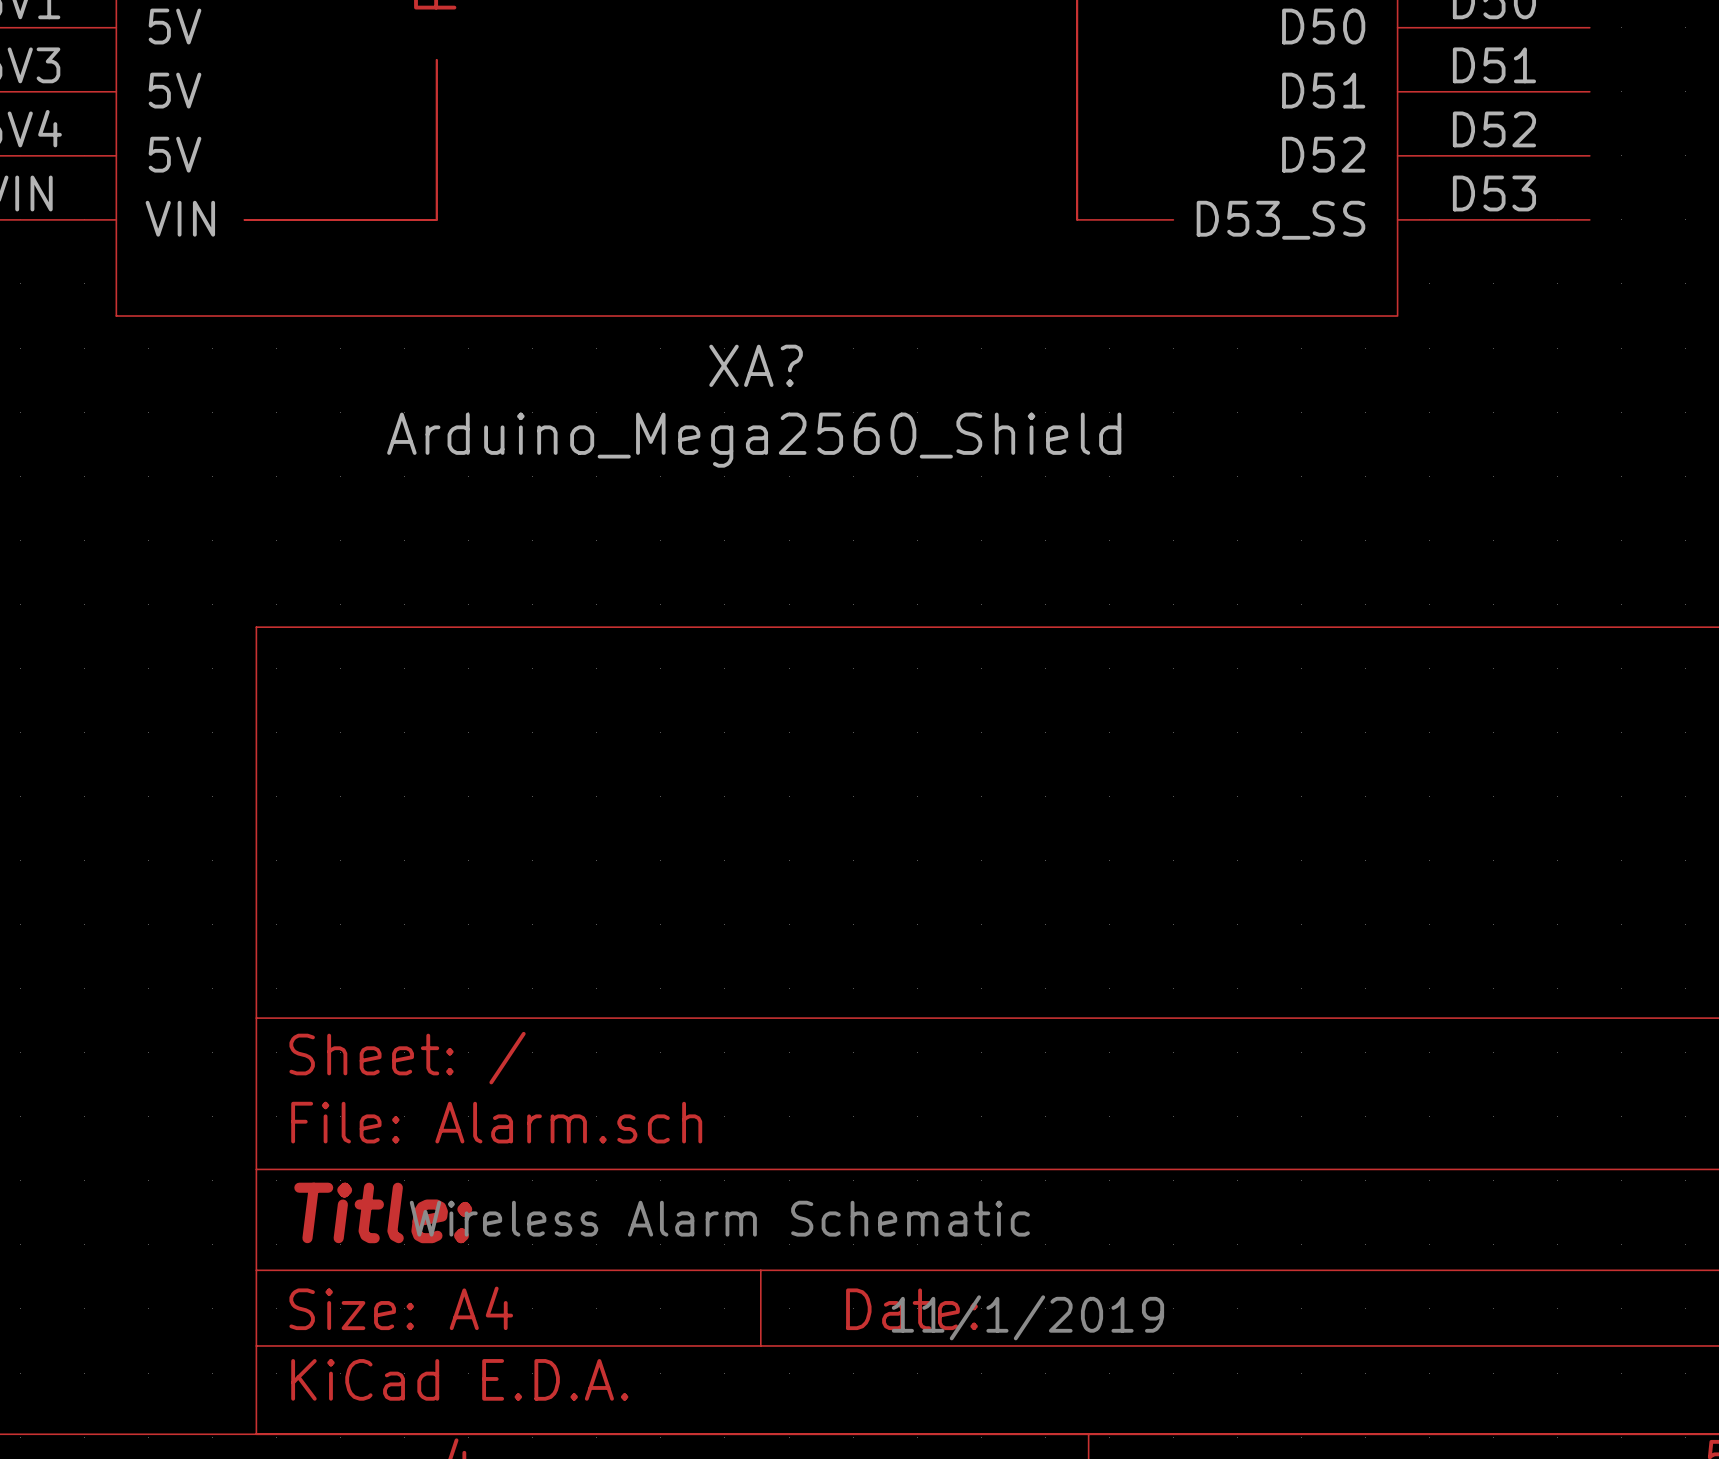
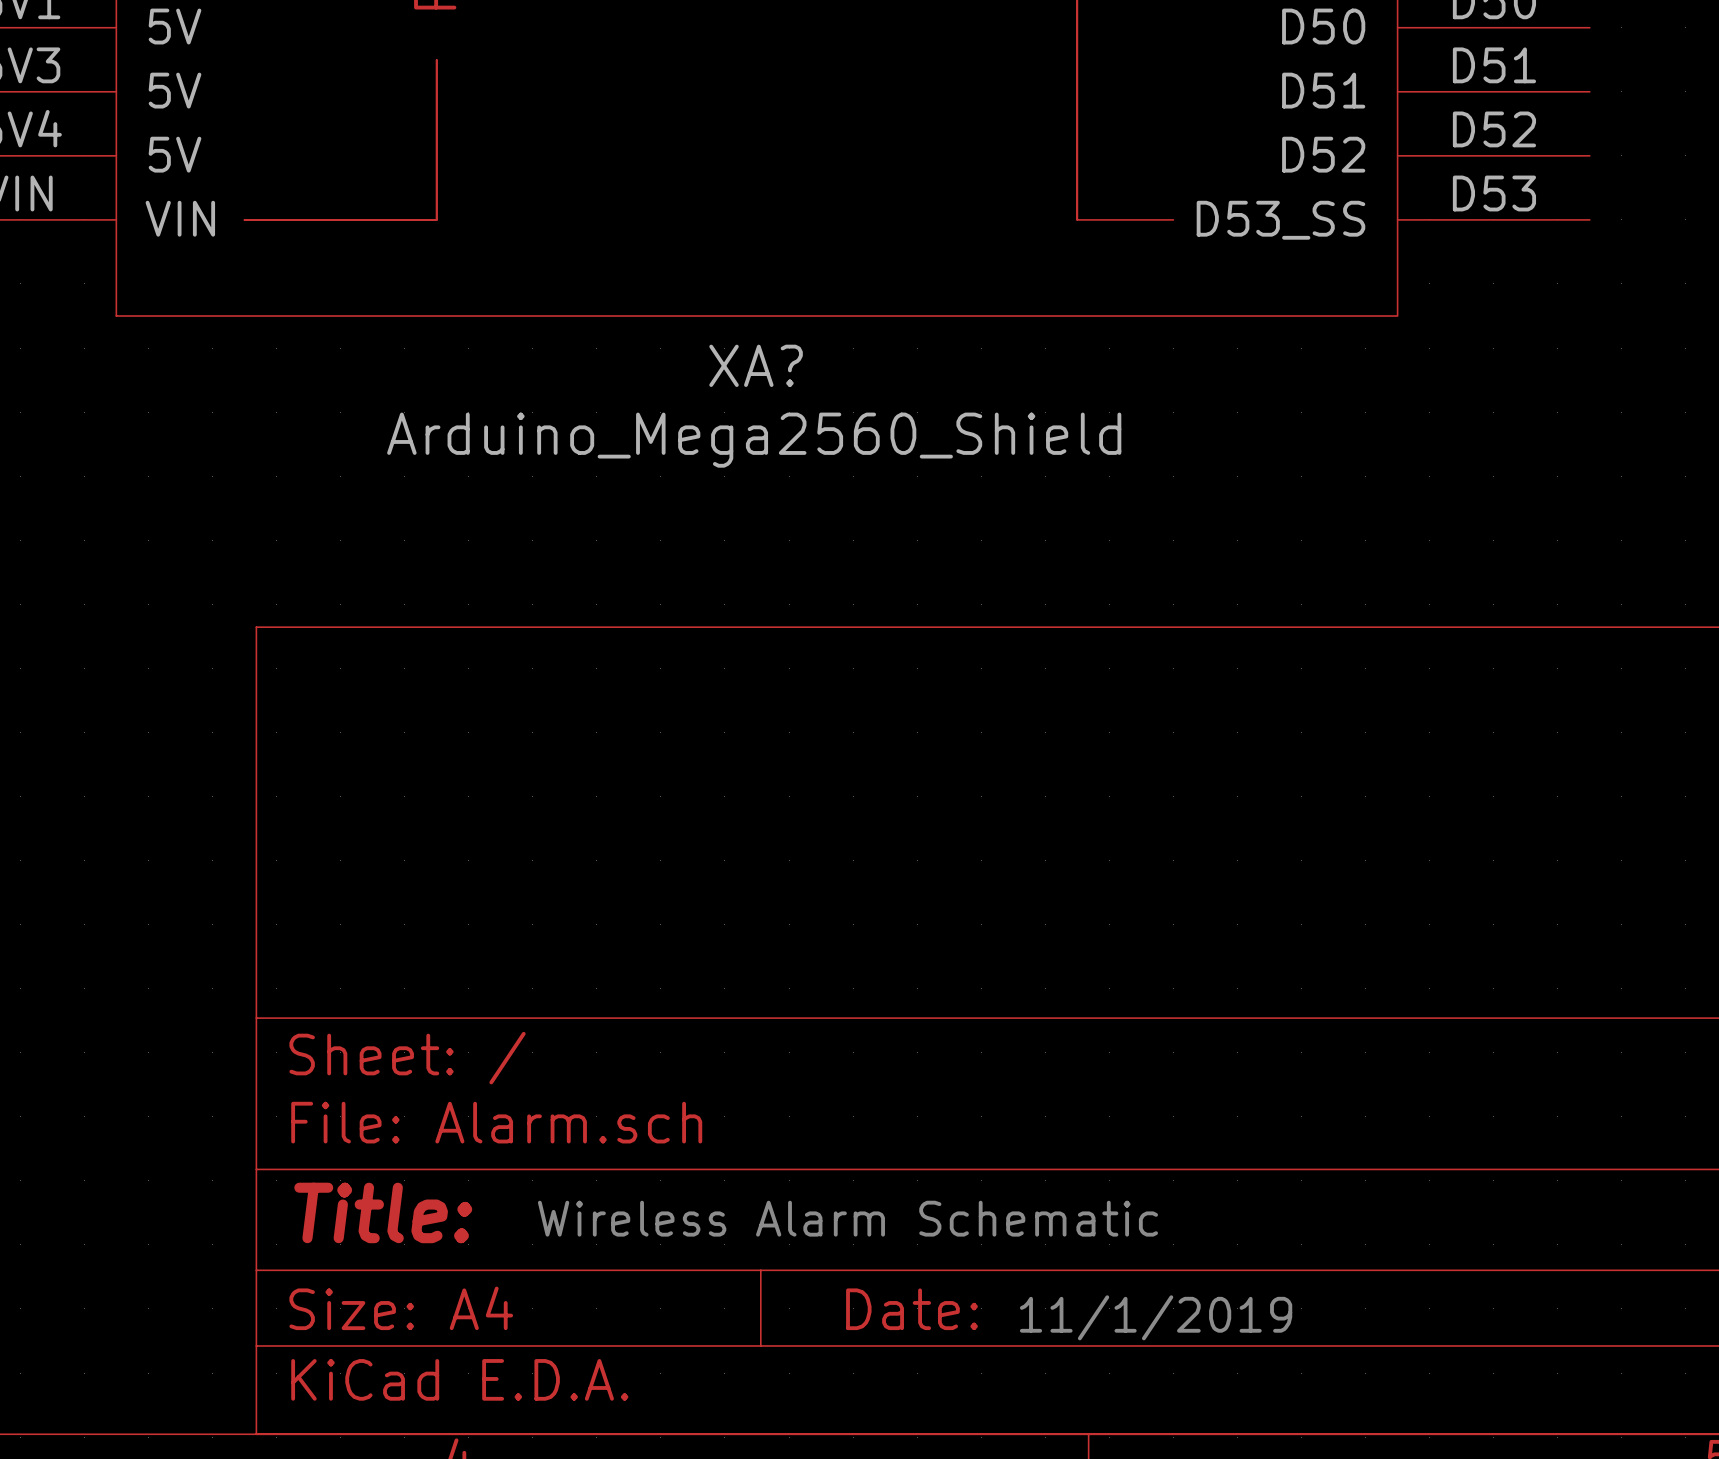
text position: Wireless Alarm Schematic (719, 1218) -> Wireless Alarm Schematic (847, 1218)
text position: 11/1/2019 (1027, 1317) -> 11/1/2019 (1156, 1317)

